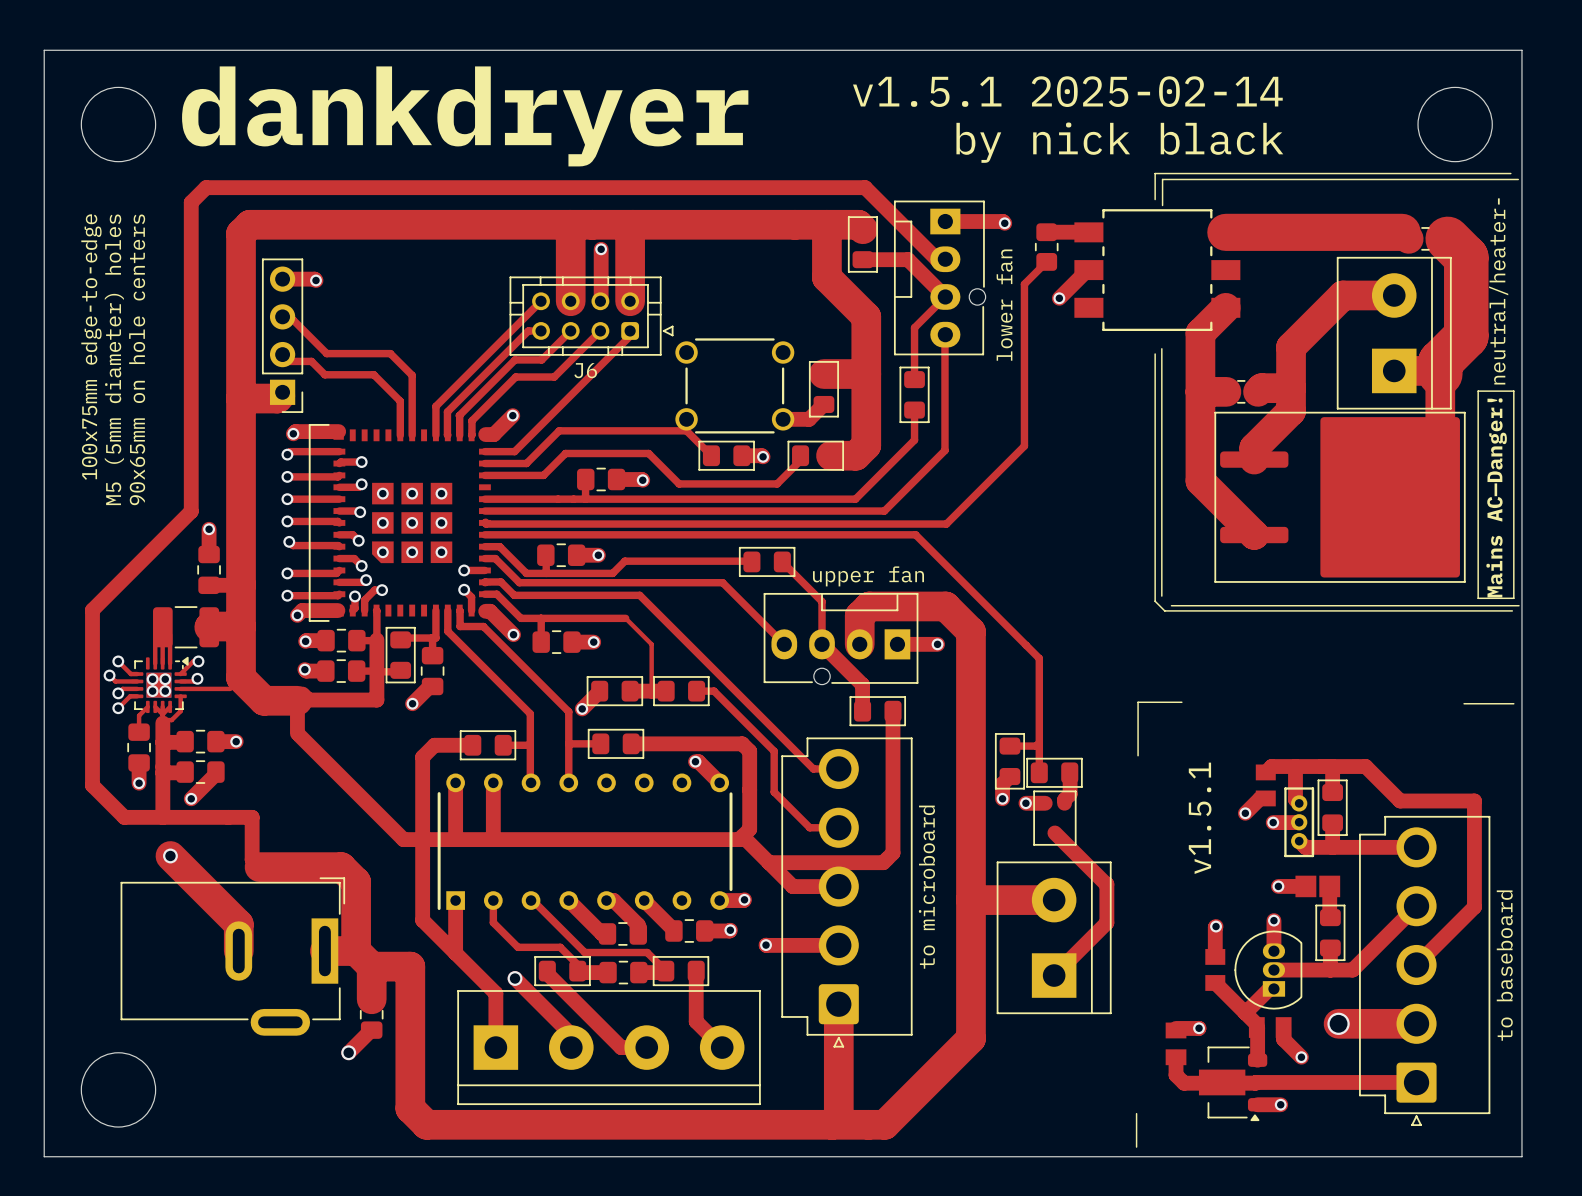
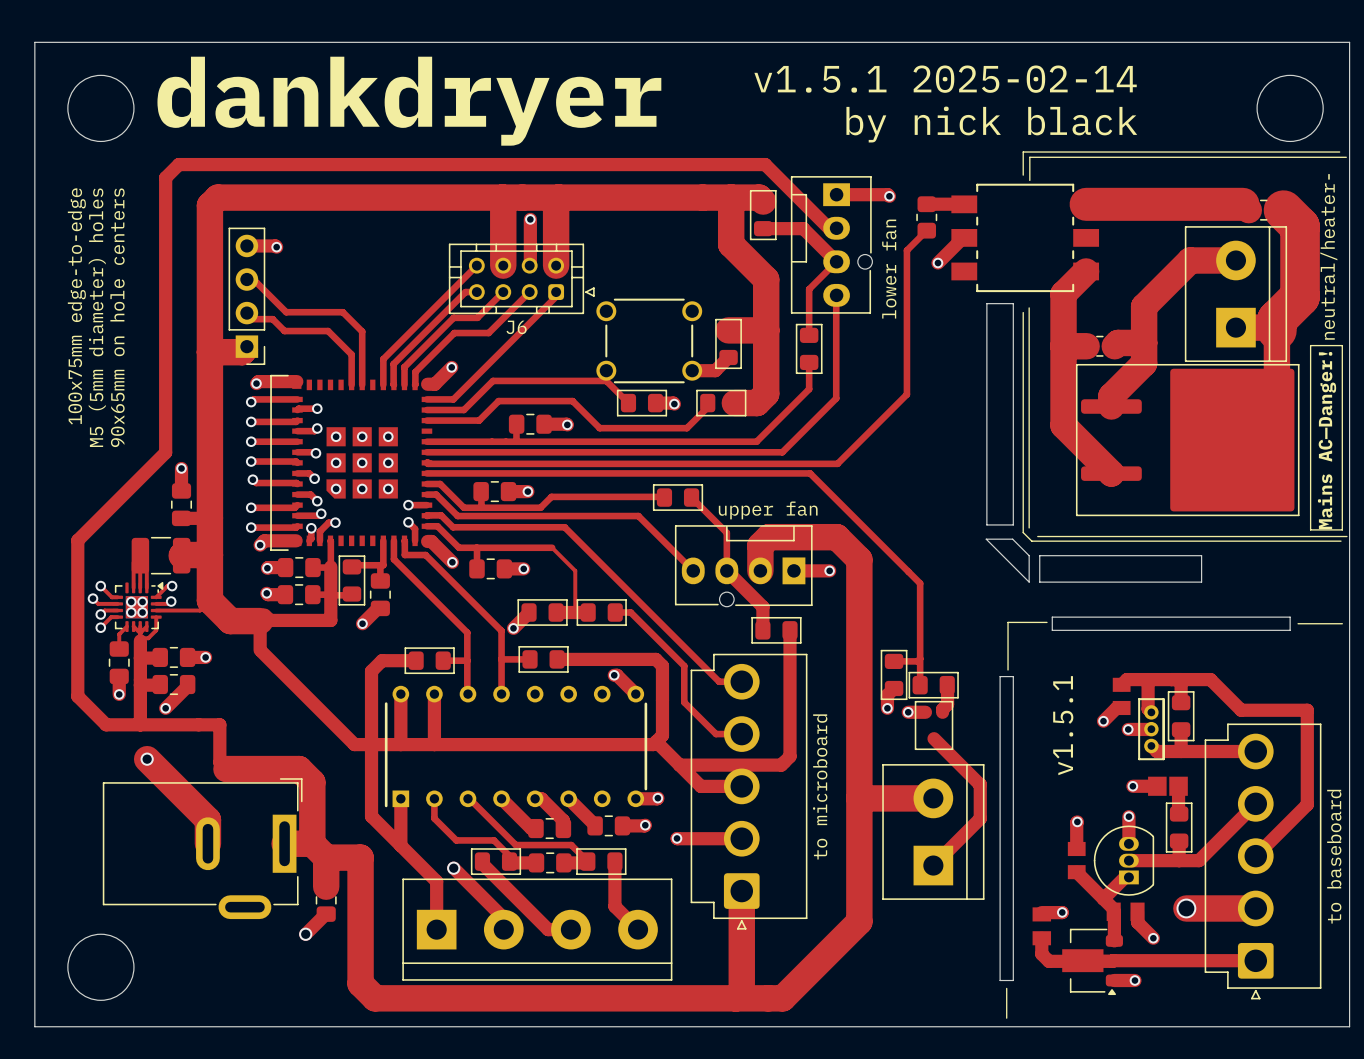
board edge: none -> (986, 303) (1013, 303) (1013, 524) (986, 524) (986, 303)
board edge: none -> (986, 539) (1029, 582) (1029, 555) (1012, 539) (986, 539)
board edge: none -> (1039, 555) (1201, 555) (1201, 582) (1039, 582) (1039, 555)
board edge: none -> (1052, 617) (1290, 617) (1290, 630) (1052, 630) (1052, 617)
board edge: none -> (1000, 676) (1013, 676) (1013, 980) (1000, 980) (1000, 676)

